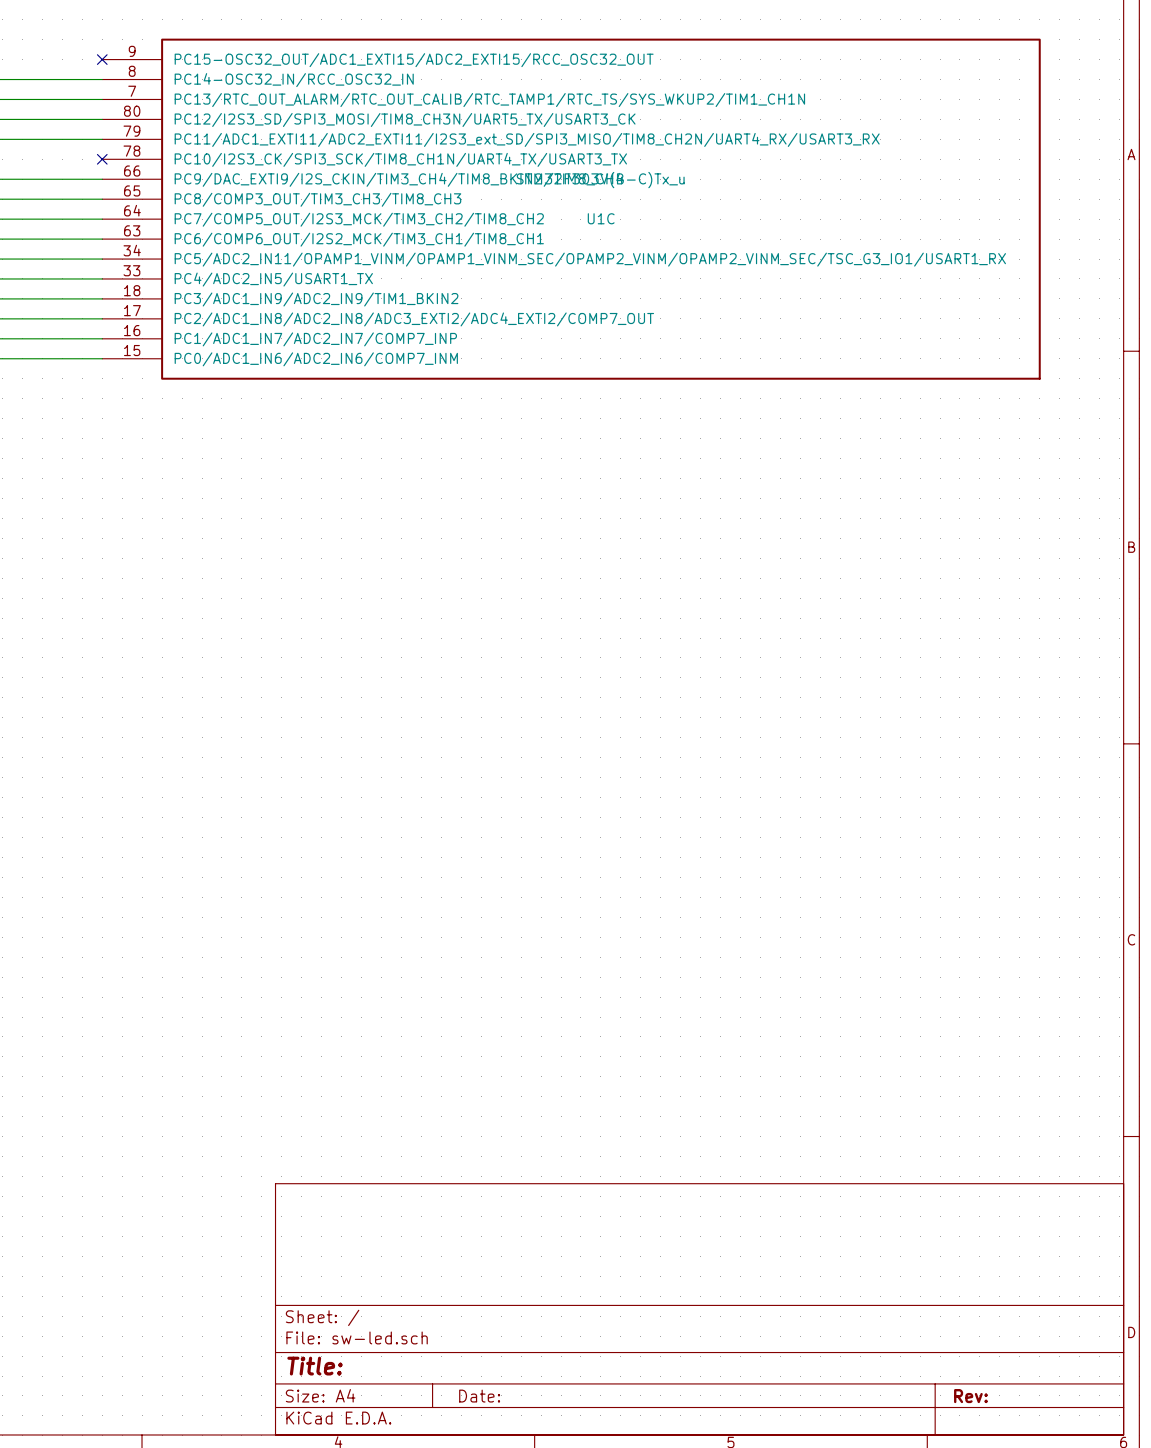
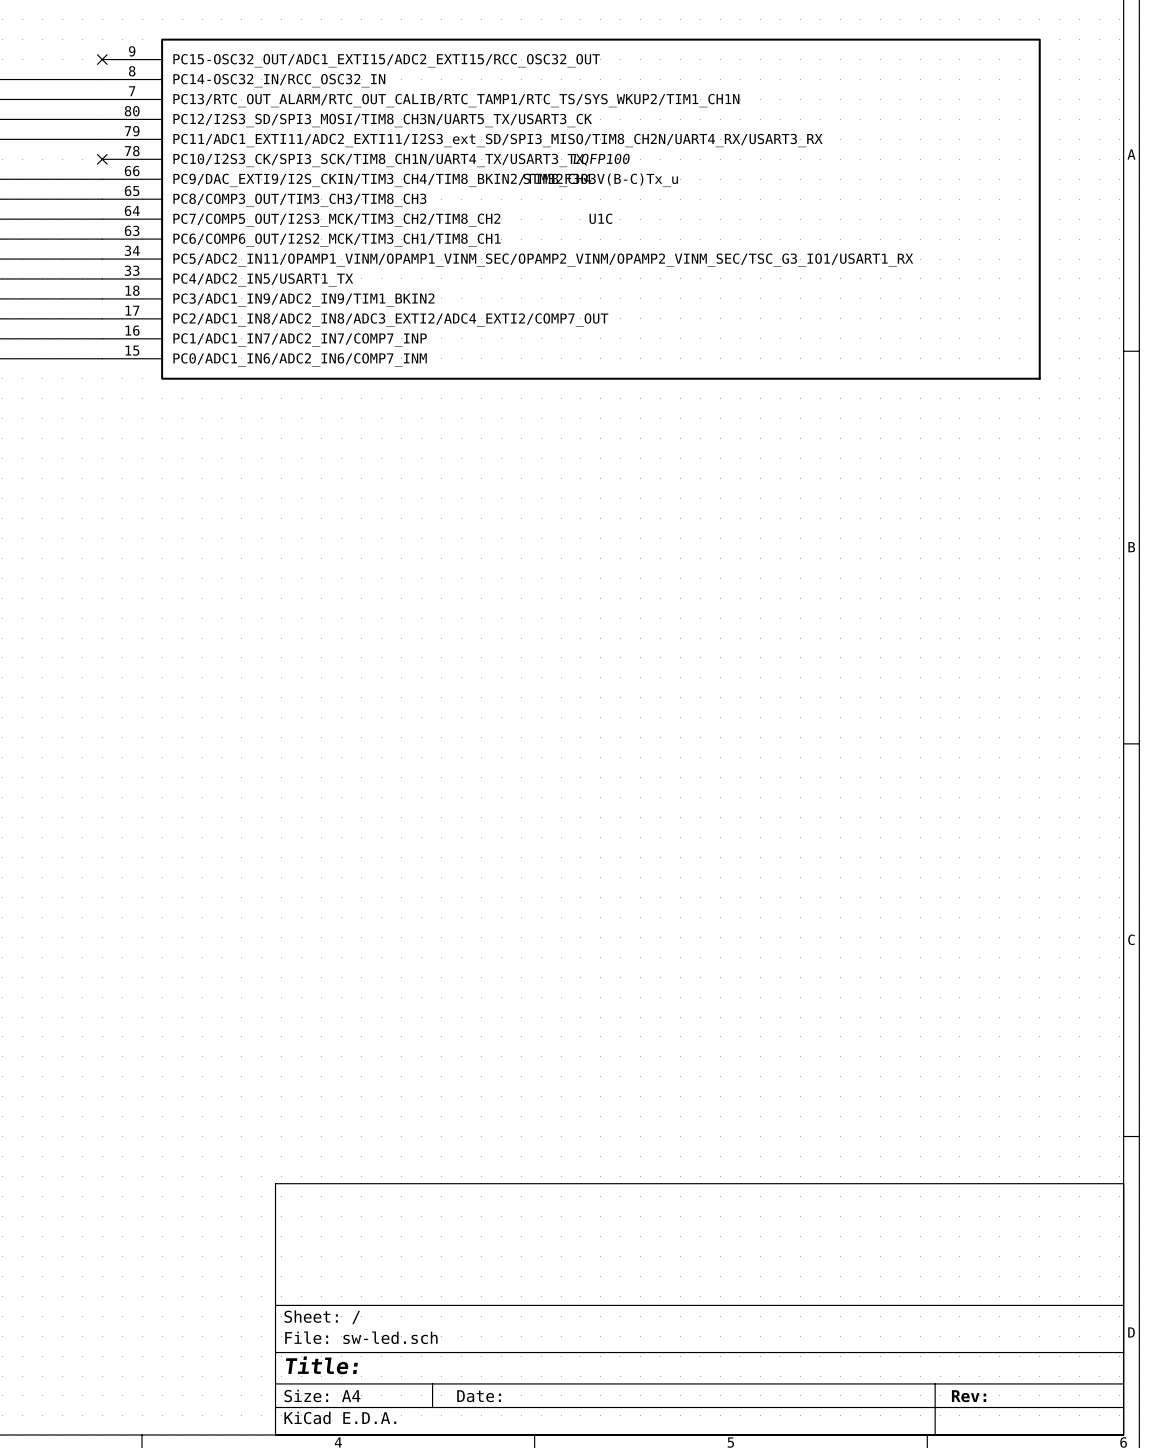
U1C text: none -> LQFP100 (601, 159)

